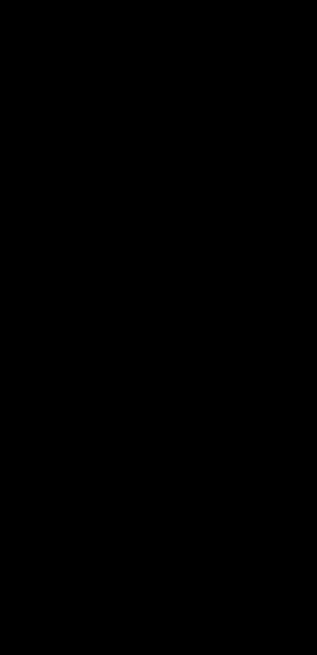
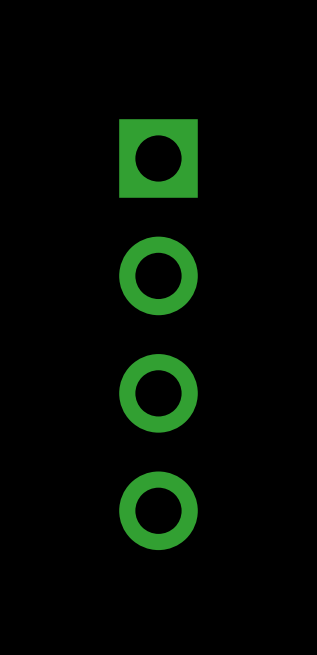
part: none -> (158, 334)

